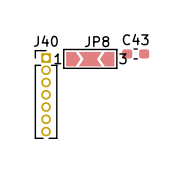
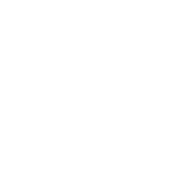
C43: (135, 53) -> none
JP8: (90, 58) -> none
J40: (46, 94) -> none

